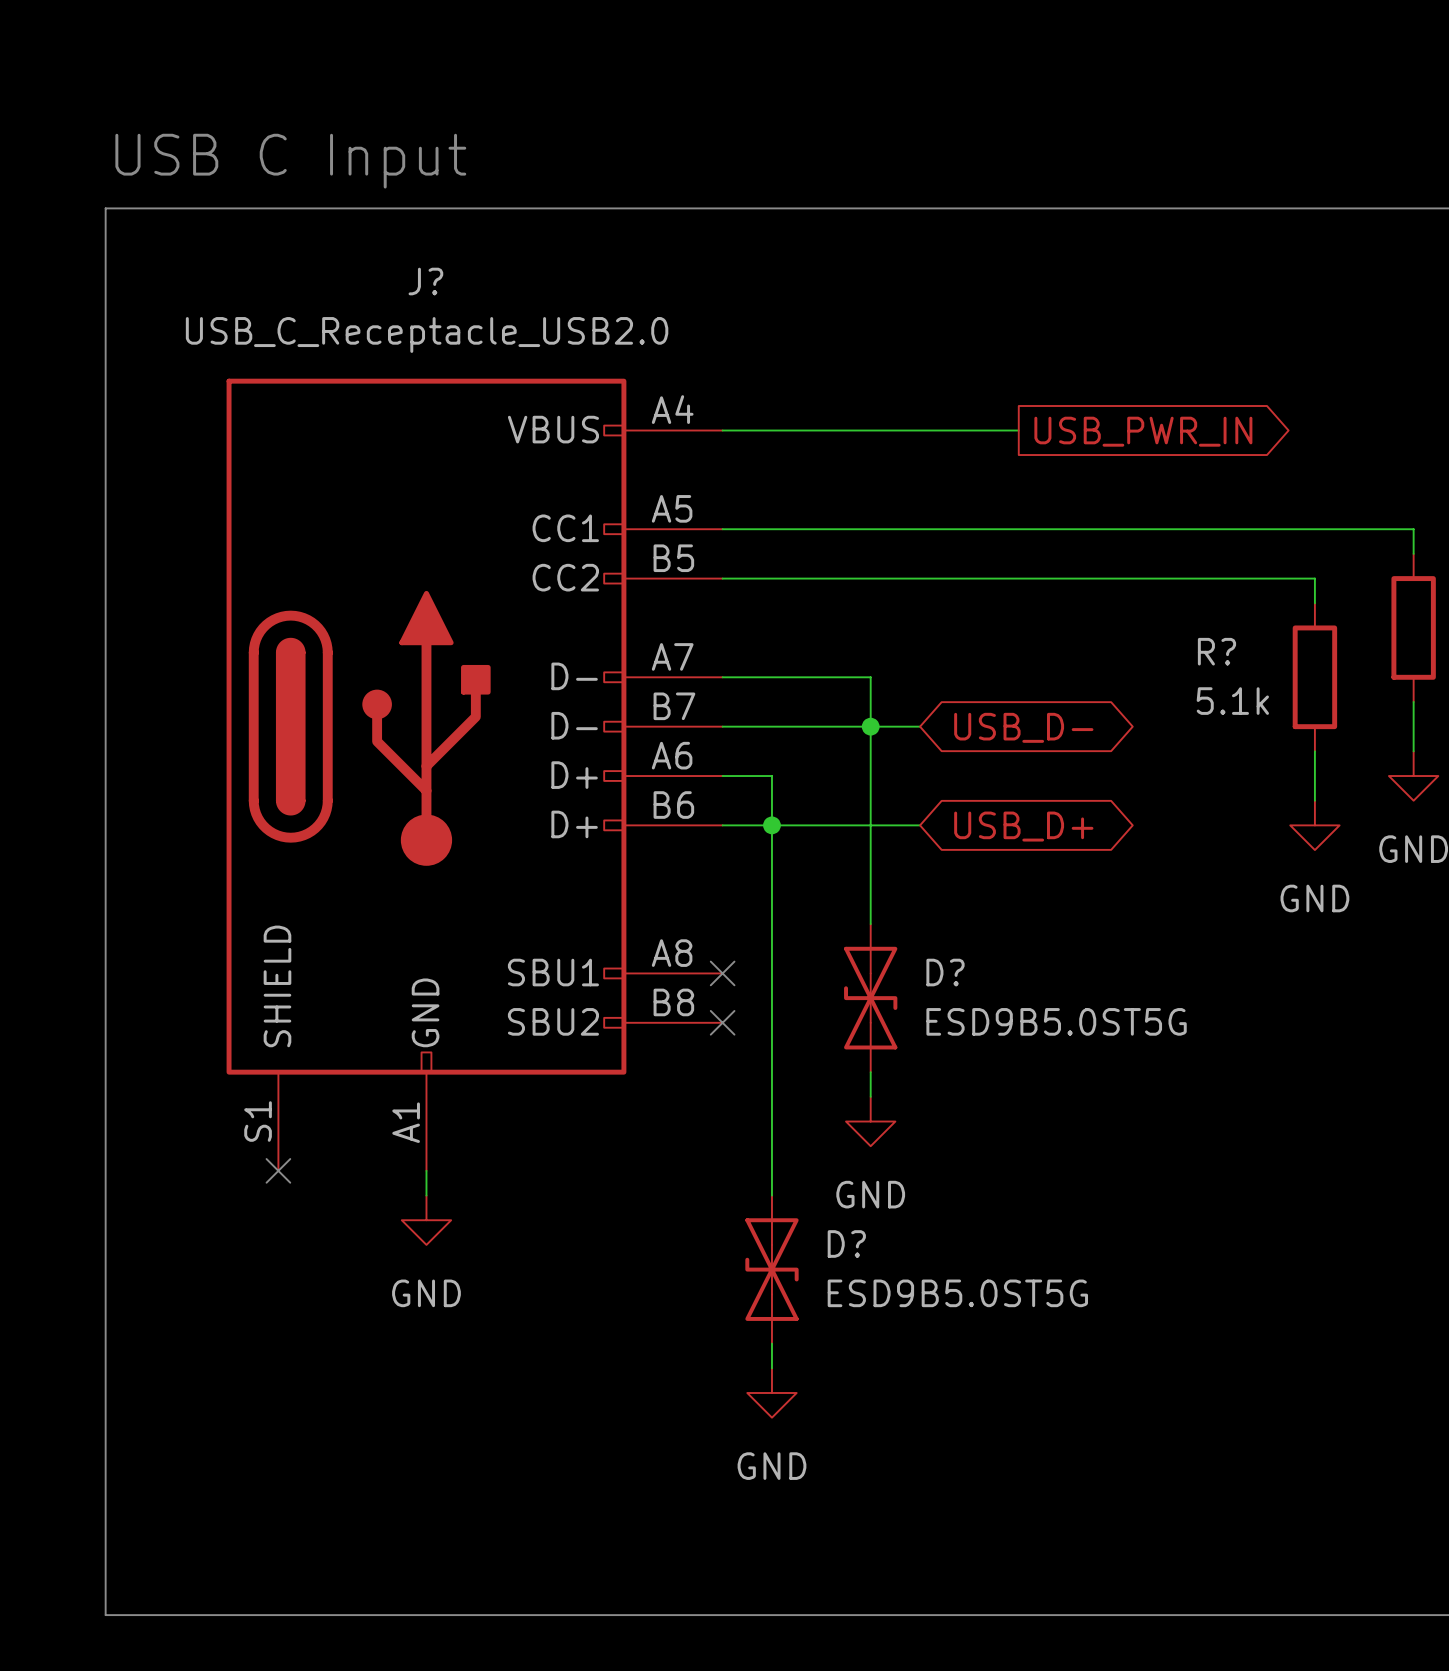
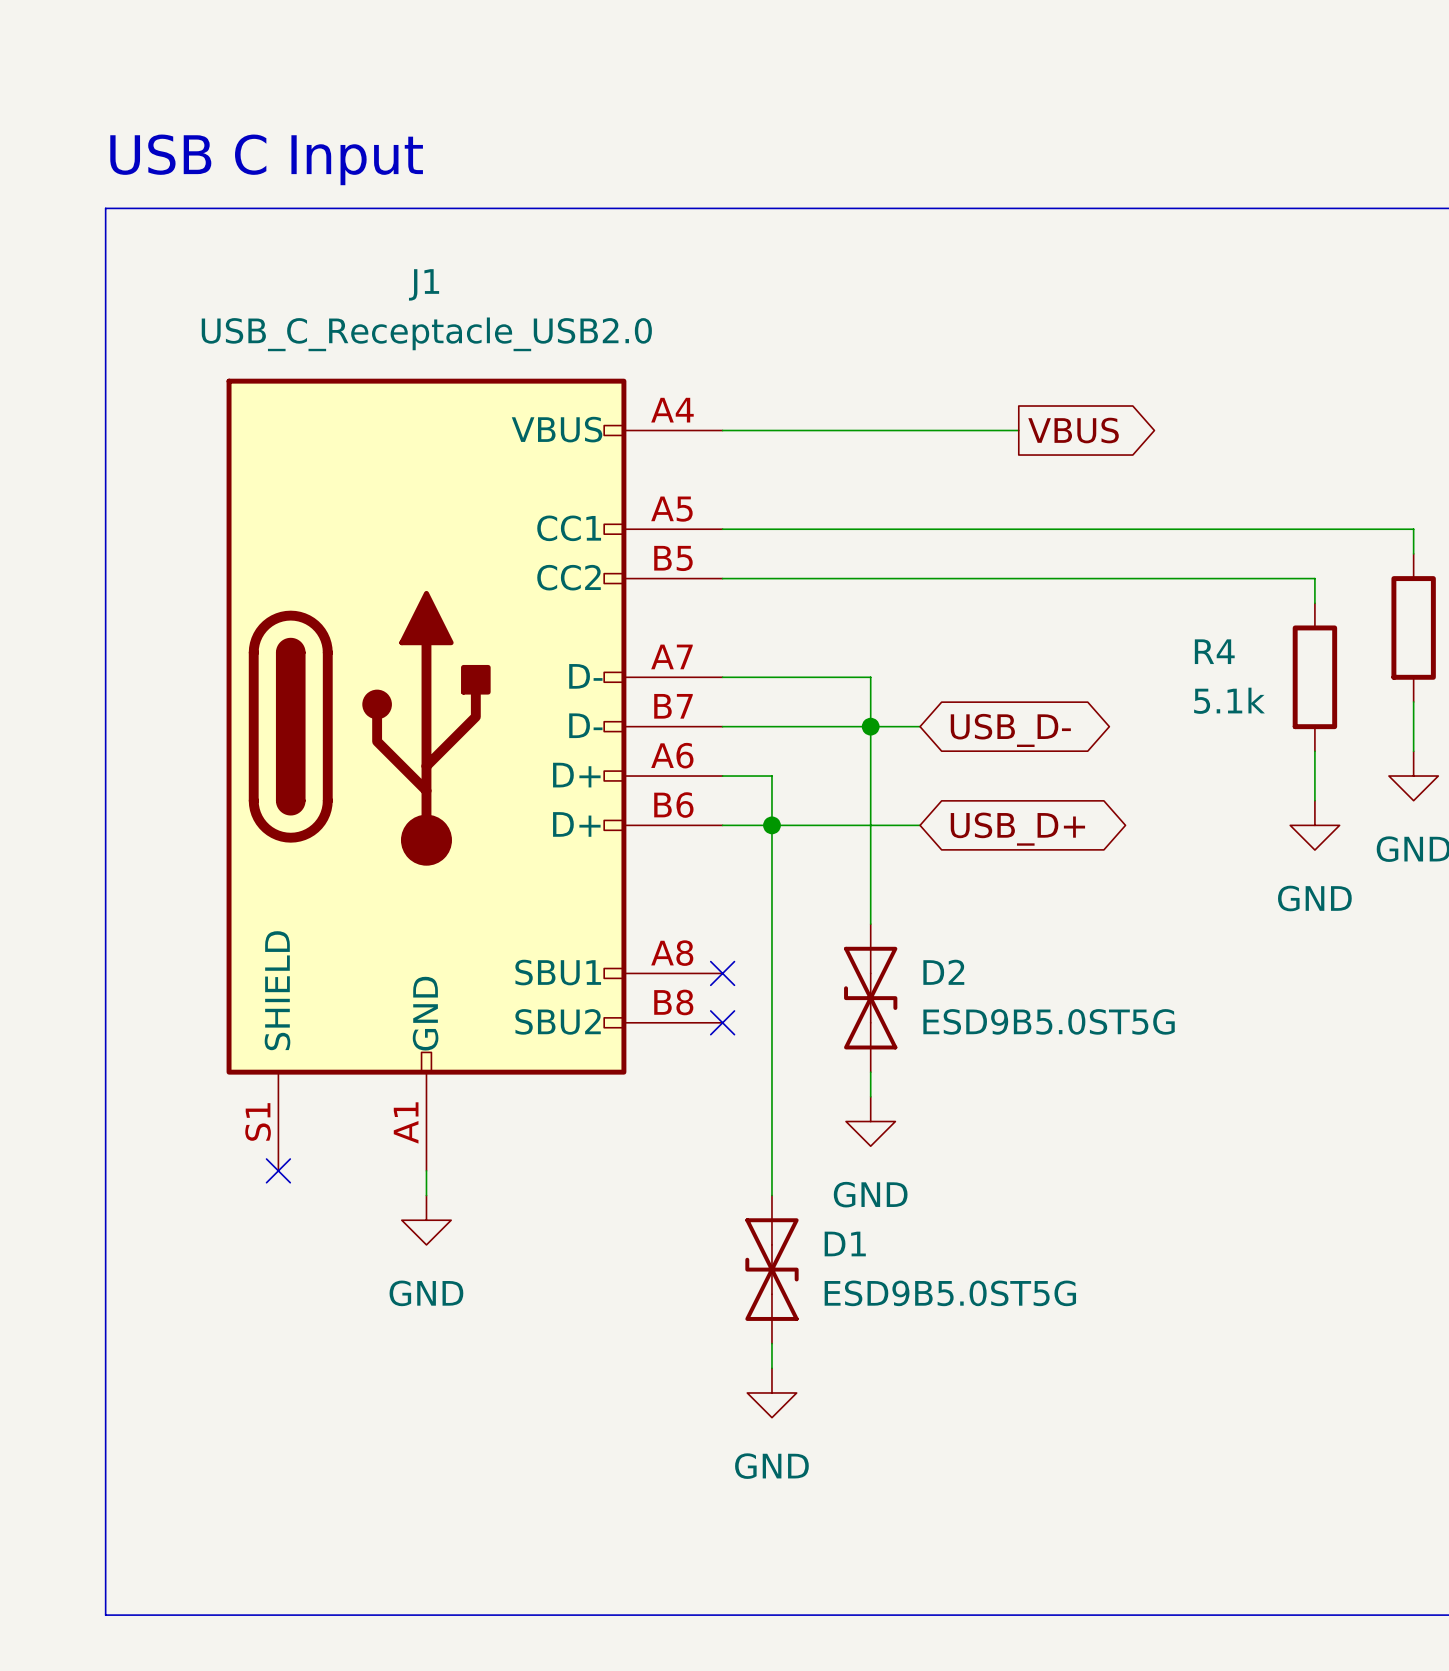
J? name: J? (425, 281) -> J1 (424, 284)
global label: USB_PWR_IN (1143, 431) -> VBUS (1073, 430)
R? name: R? (1216, 651) -> R4 (1214, 651)
D? name: D? (945, 972) -> D2 (943, 972)
D? name: D? (846, 1243) -> D1 (845, 1243)

